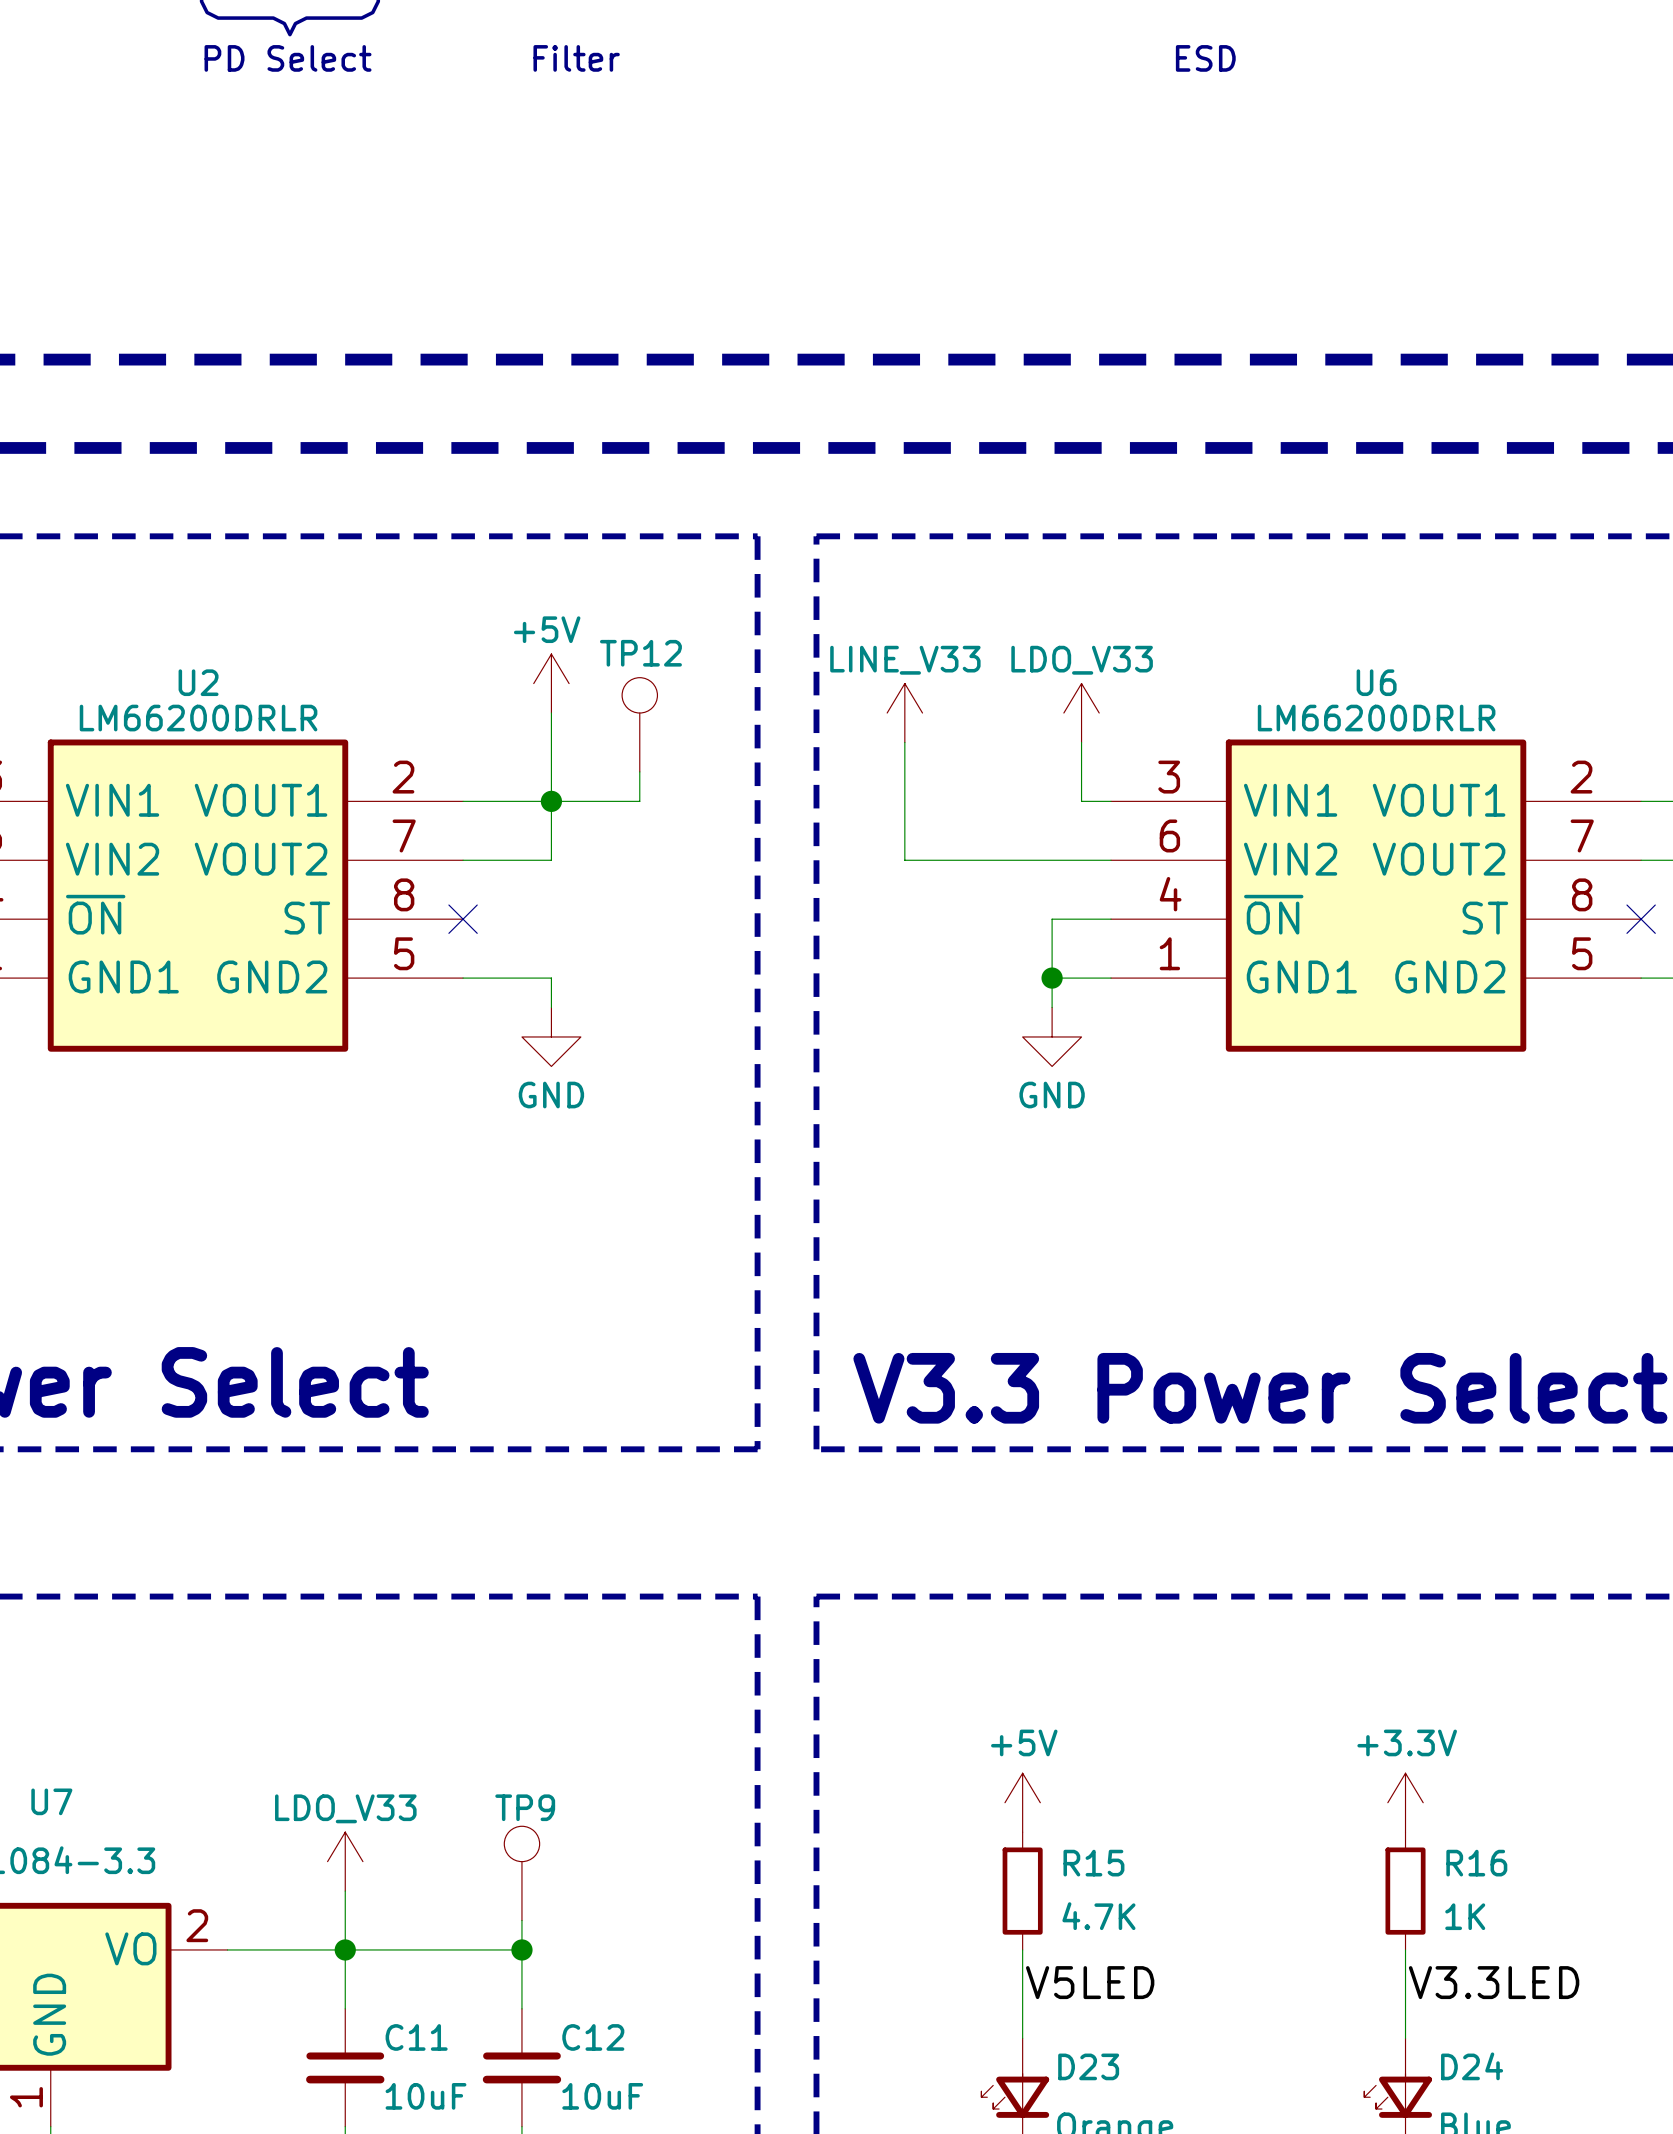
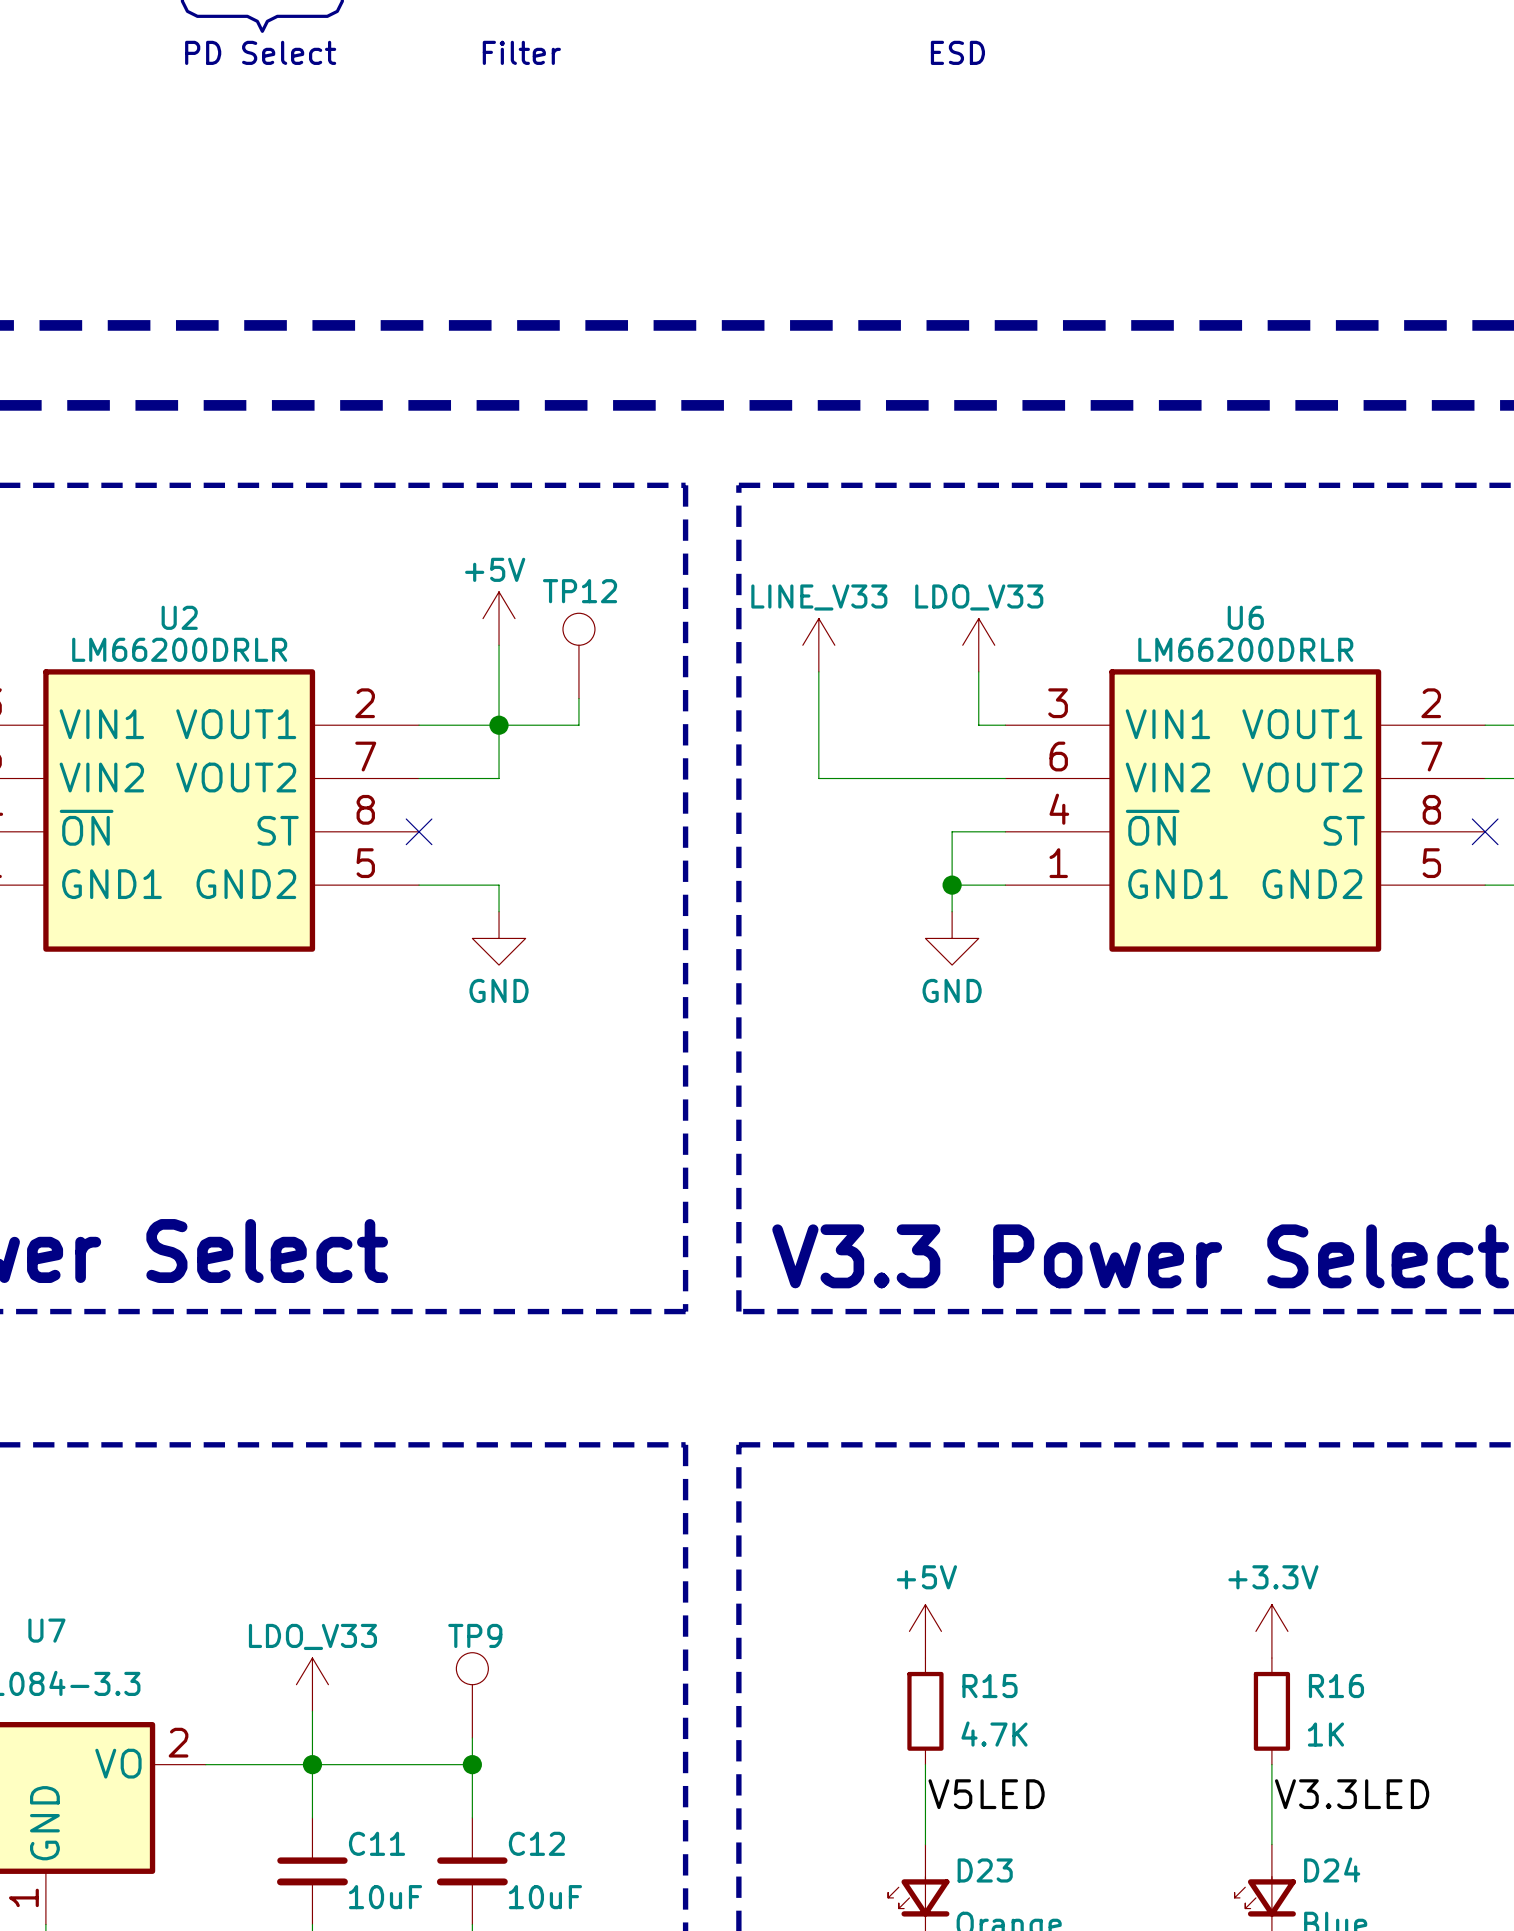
text position: ESD (1205, 58) -> ESD (957, 52)

